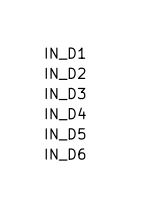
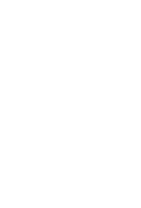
label: IN_D1 (65, 53) -> none
label: IN_D2 (65, 73) -> none
label: IN_D3 (65, 93) -> none
label: IN_D4 (65, 113) -> none
label: IN_D5 (65, 134) -> none
label: IN_D6 (65, 154) -> none

